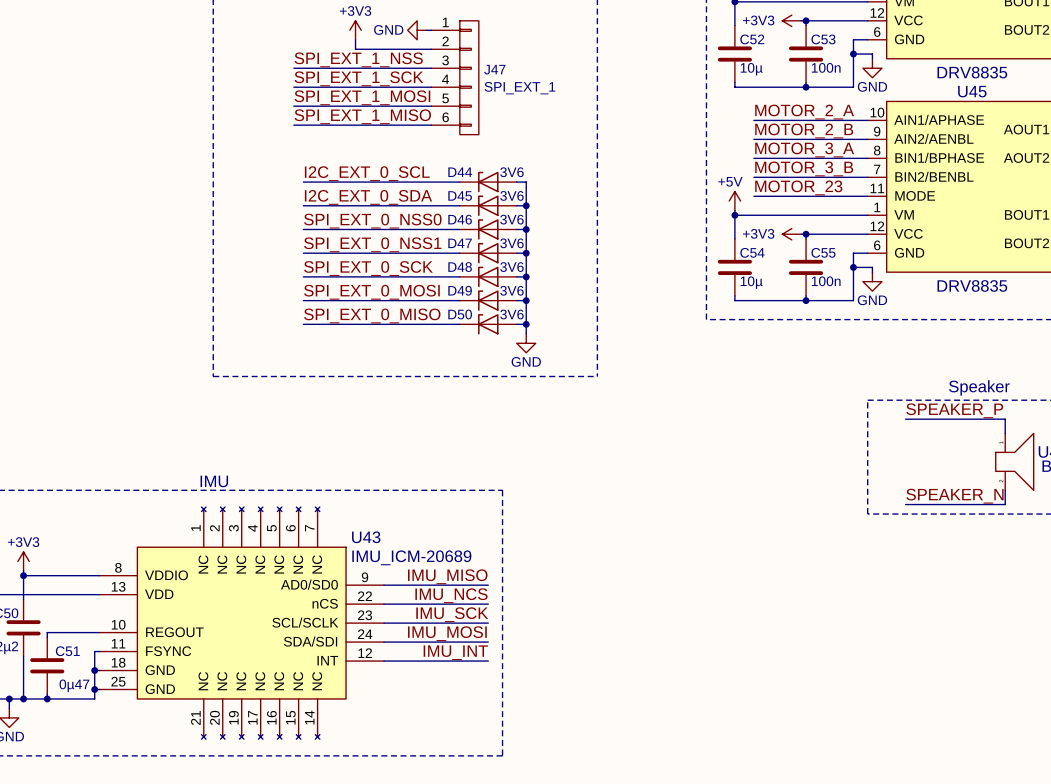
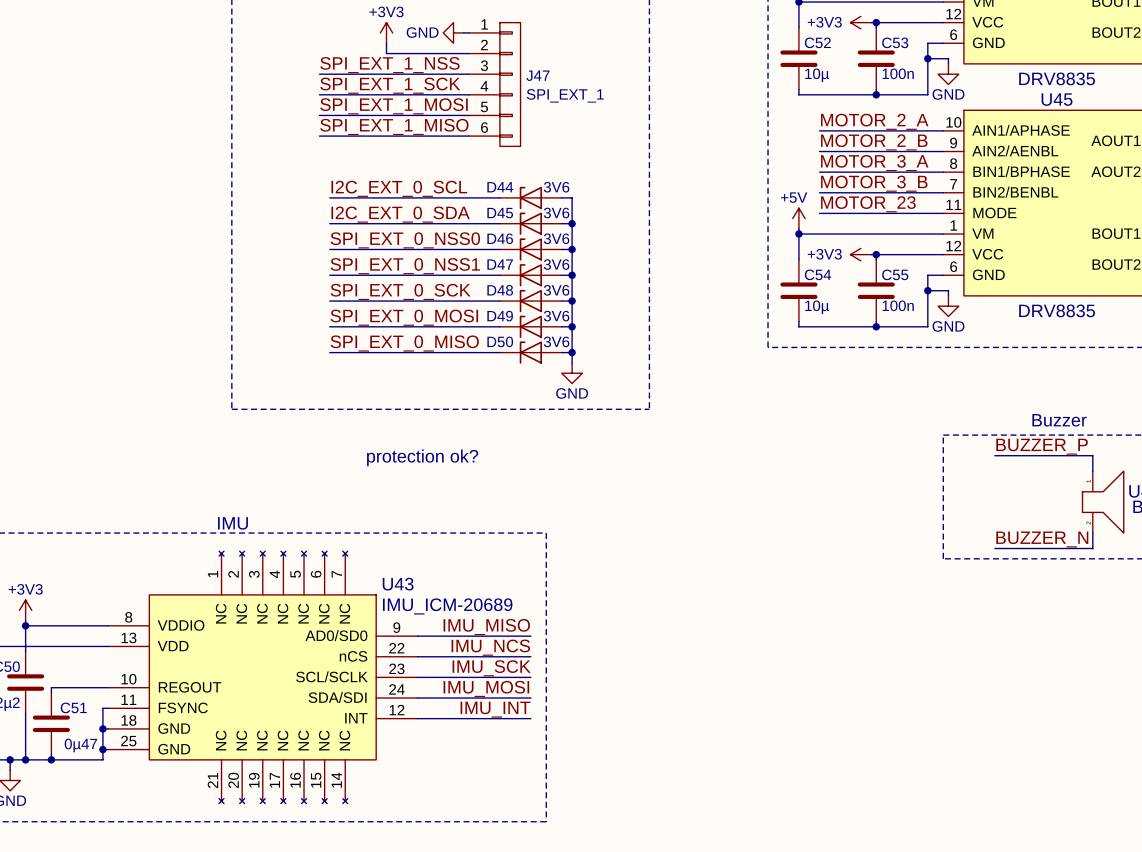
text: Speaker (979, 387) -> Buzzer (1059, 420)
label: SPEAKER_P (954, 410) -> none
label: none -> BUZZER_P (1042, 446)
wire: (905, 419) (915, 419) -> none
text: none -> protection ok? (422, 457)
label: SPEAKER_N (954, 496) -> none
label: none -> BUZZER_N (1042, 539)
wire: (905, 504) (915, 504) -> none

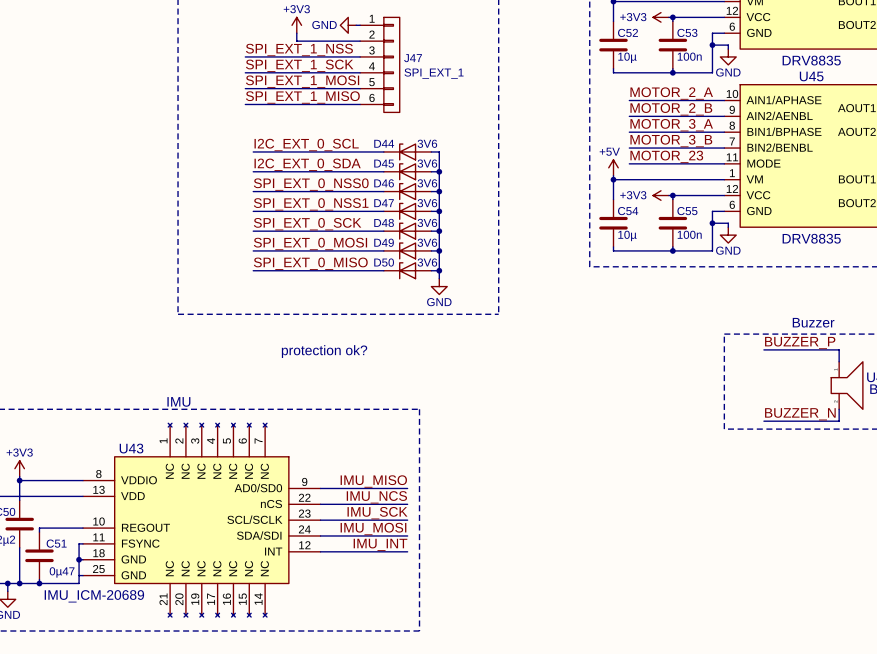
U43 name position: U43 (398, 584) -> U43 (131, 448)
U43 value position: IMU_ICM-20689 (447, 606) -> IMU_ICM-20689 (94, 596)
junction: (102, 749) -> none

